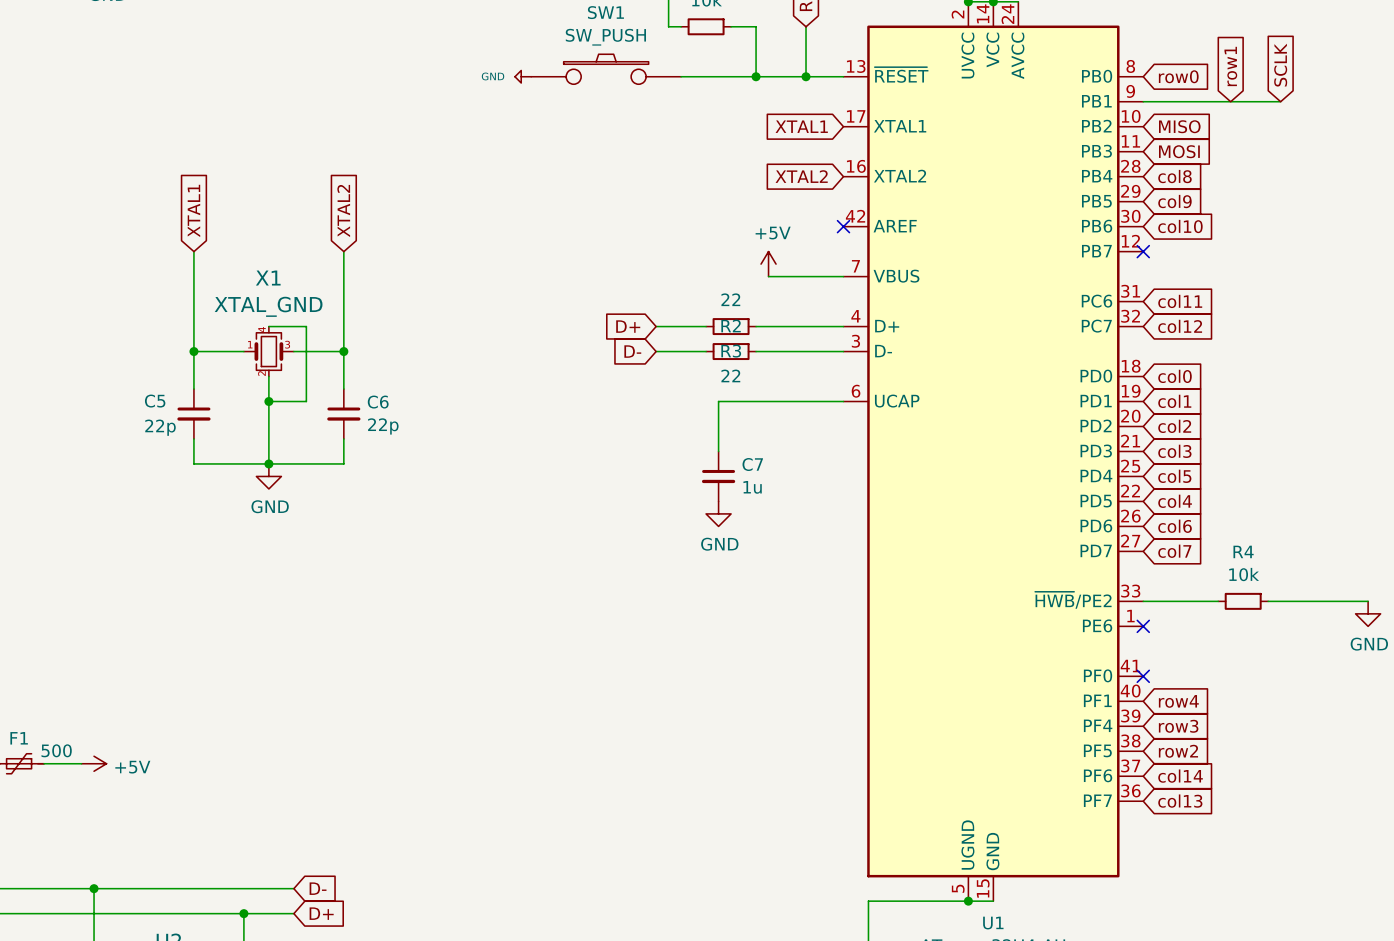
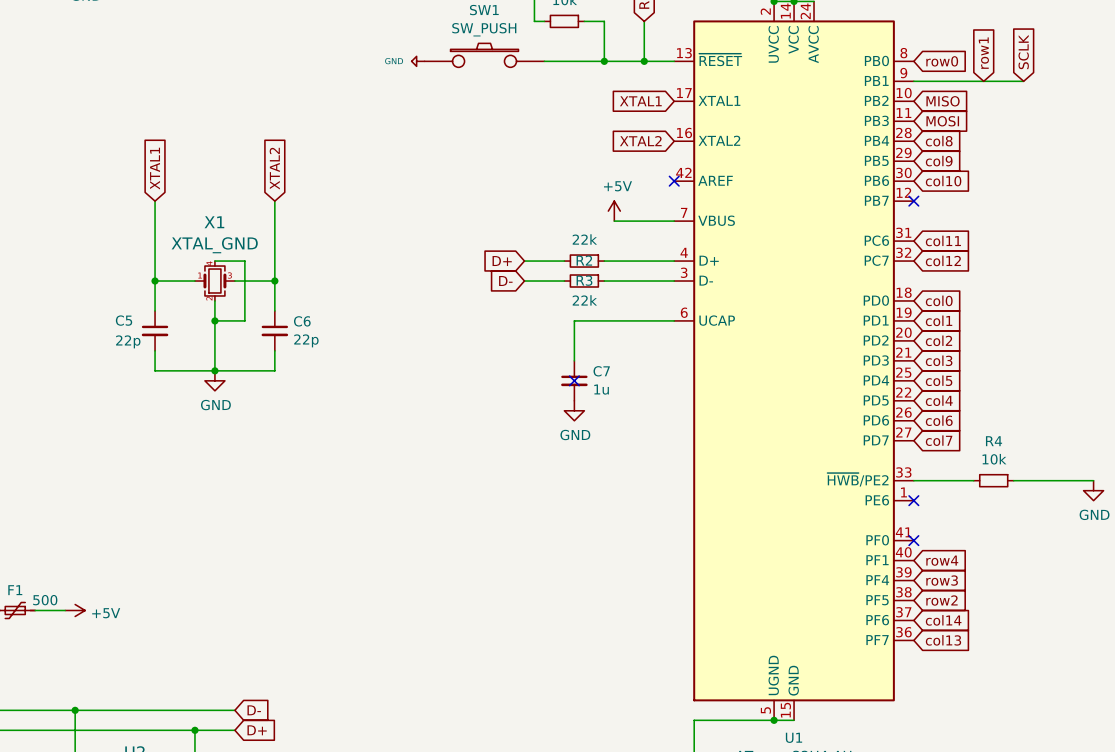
R2 value: 22 (730, 299) -> 22k (584, 239)
R3 value: 22 (730, 375) -> 22k (584, 300)
no-connect mark: none -> (574, 380)

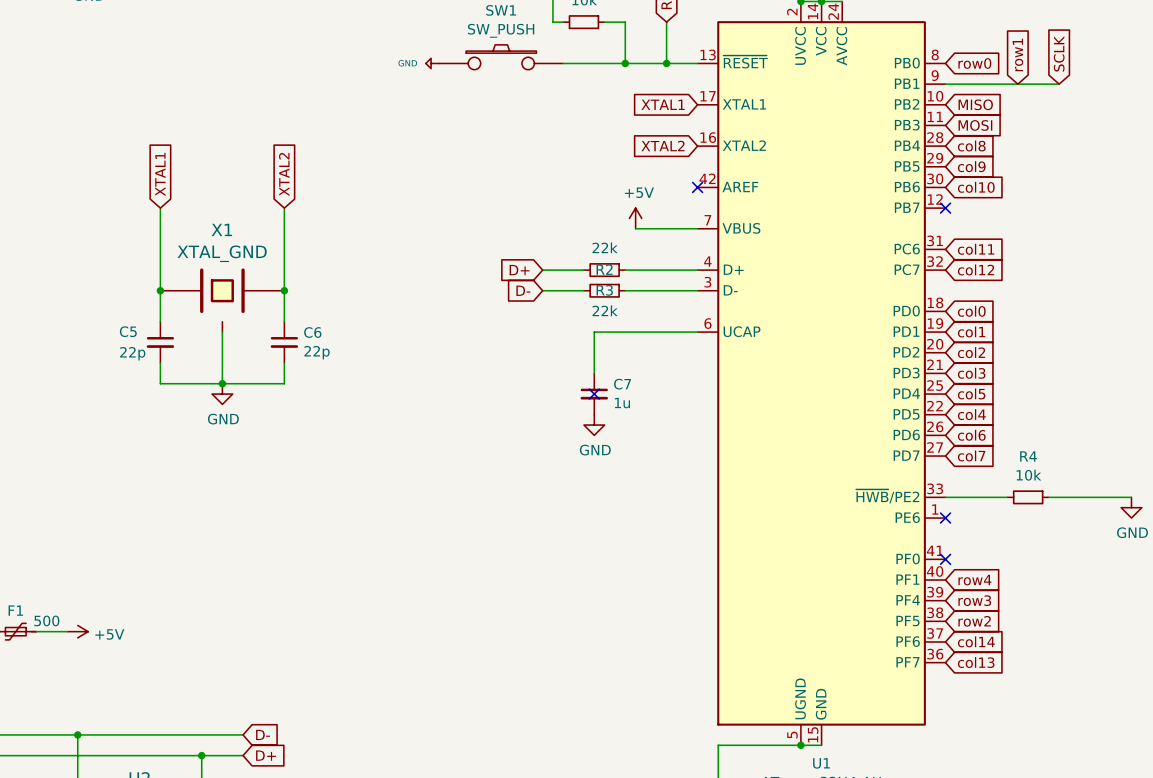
X1 symbol: [194, 261, 235, 301] -> [160, 268, 285, 333]
wire: (214, 261) (244, 261) (244, 320) (214, 320) (214, 300) -> none
junction: (214, 320) -> none

